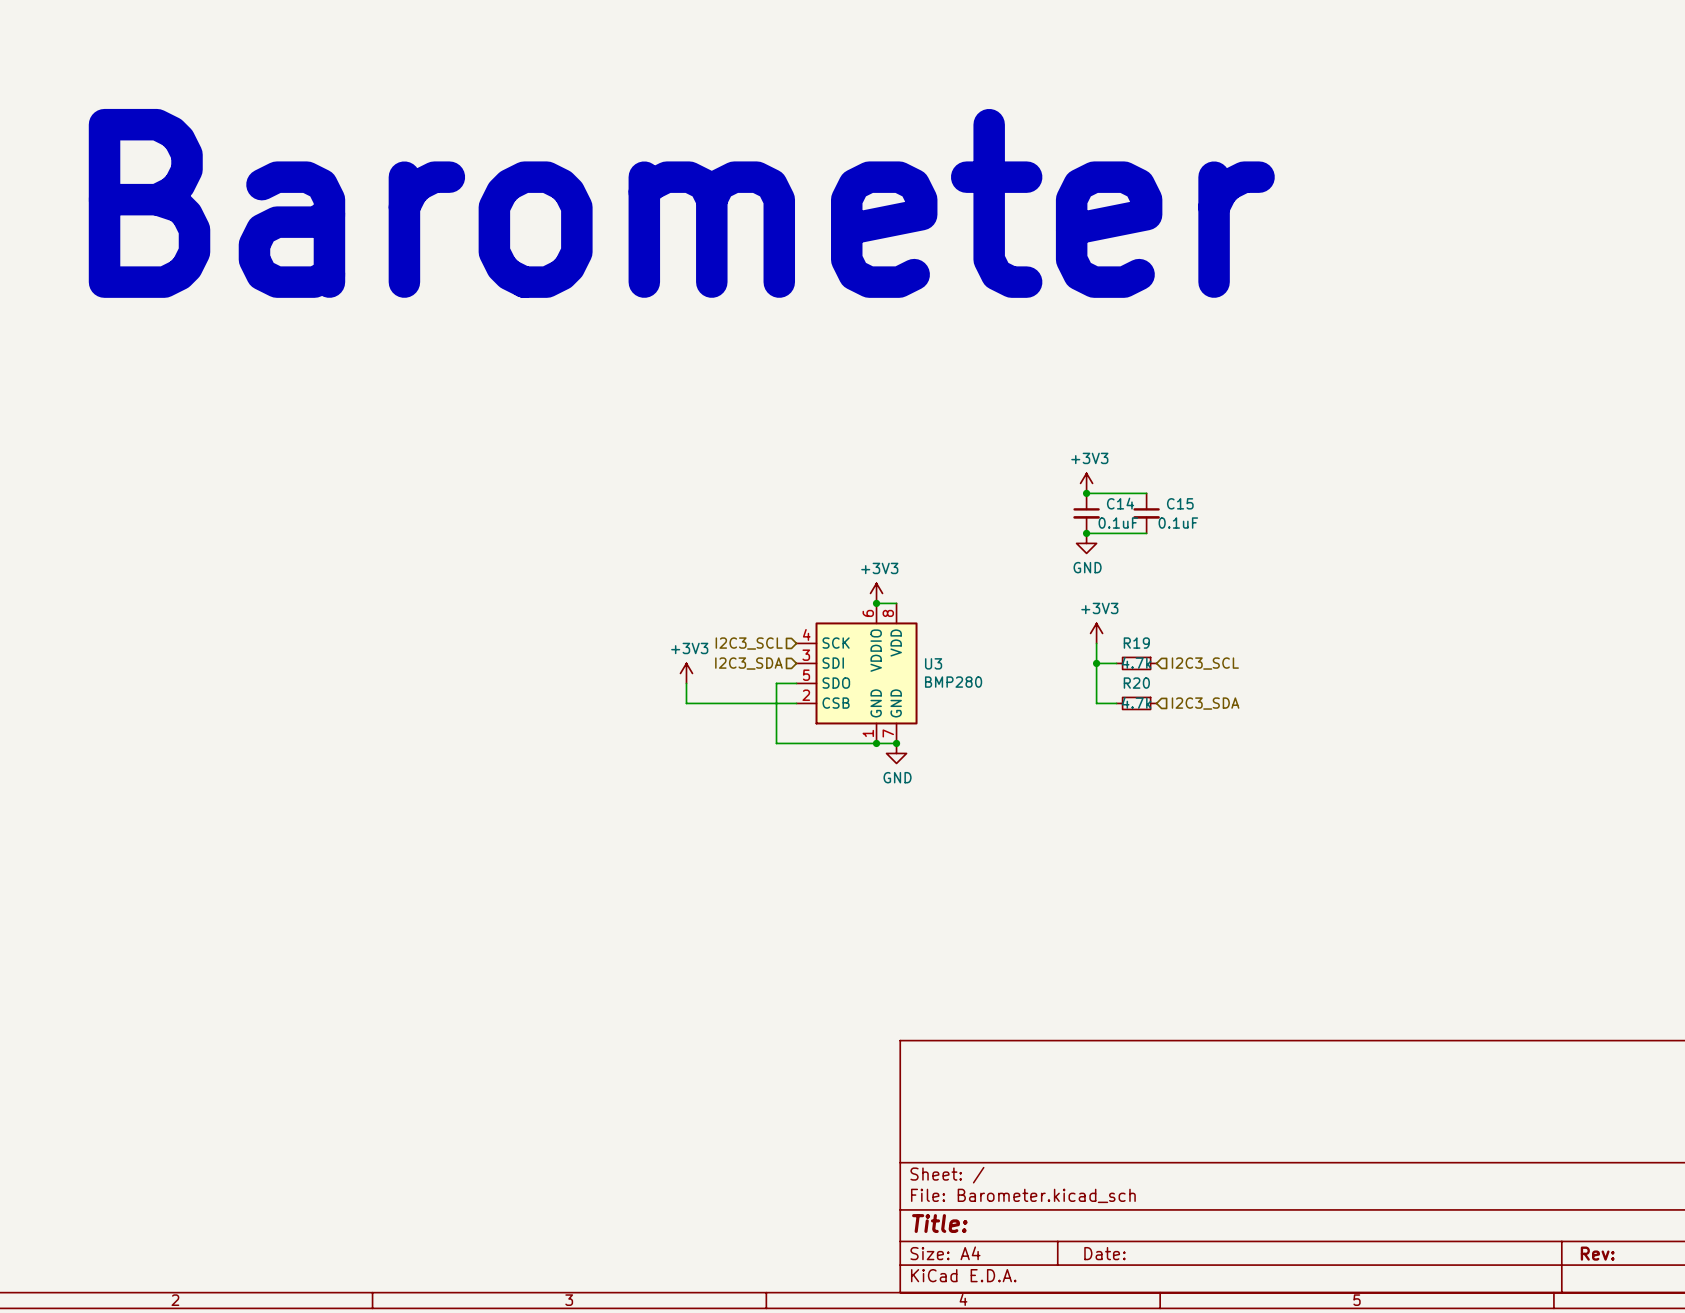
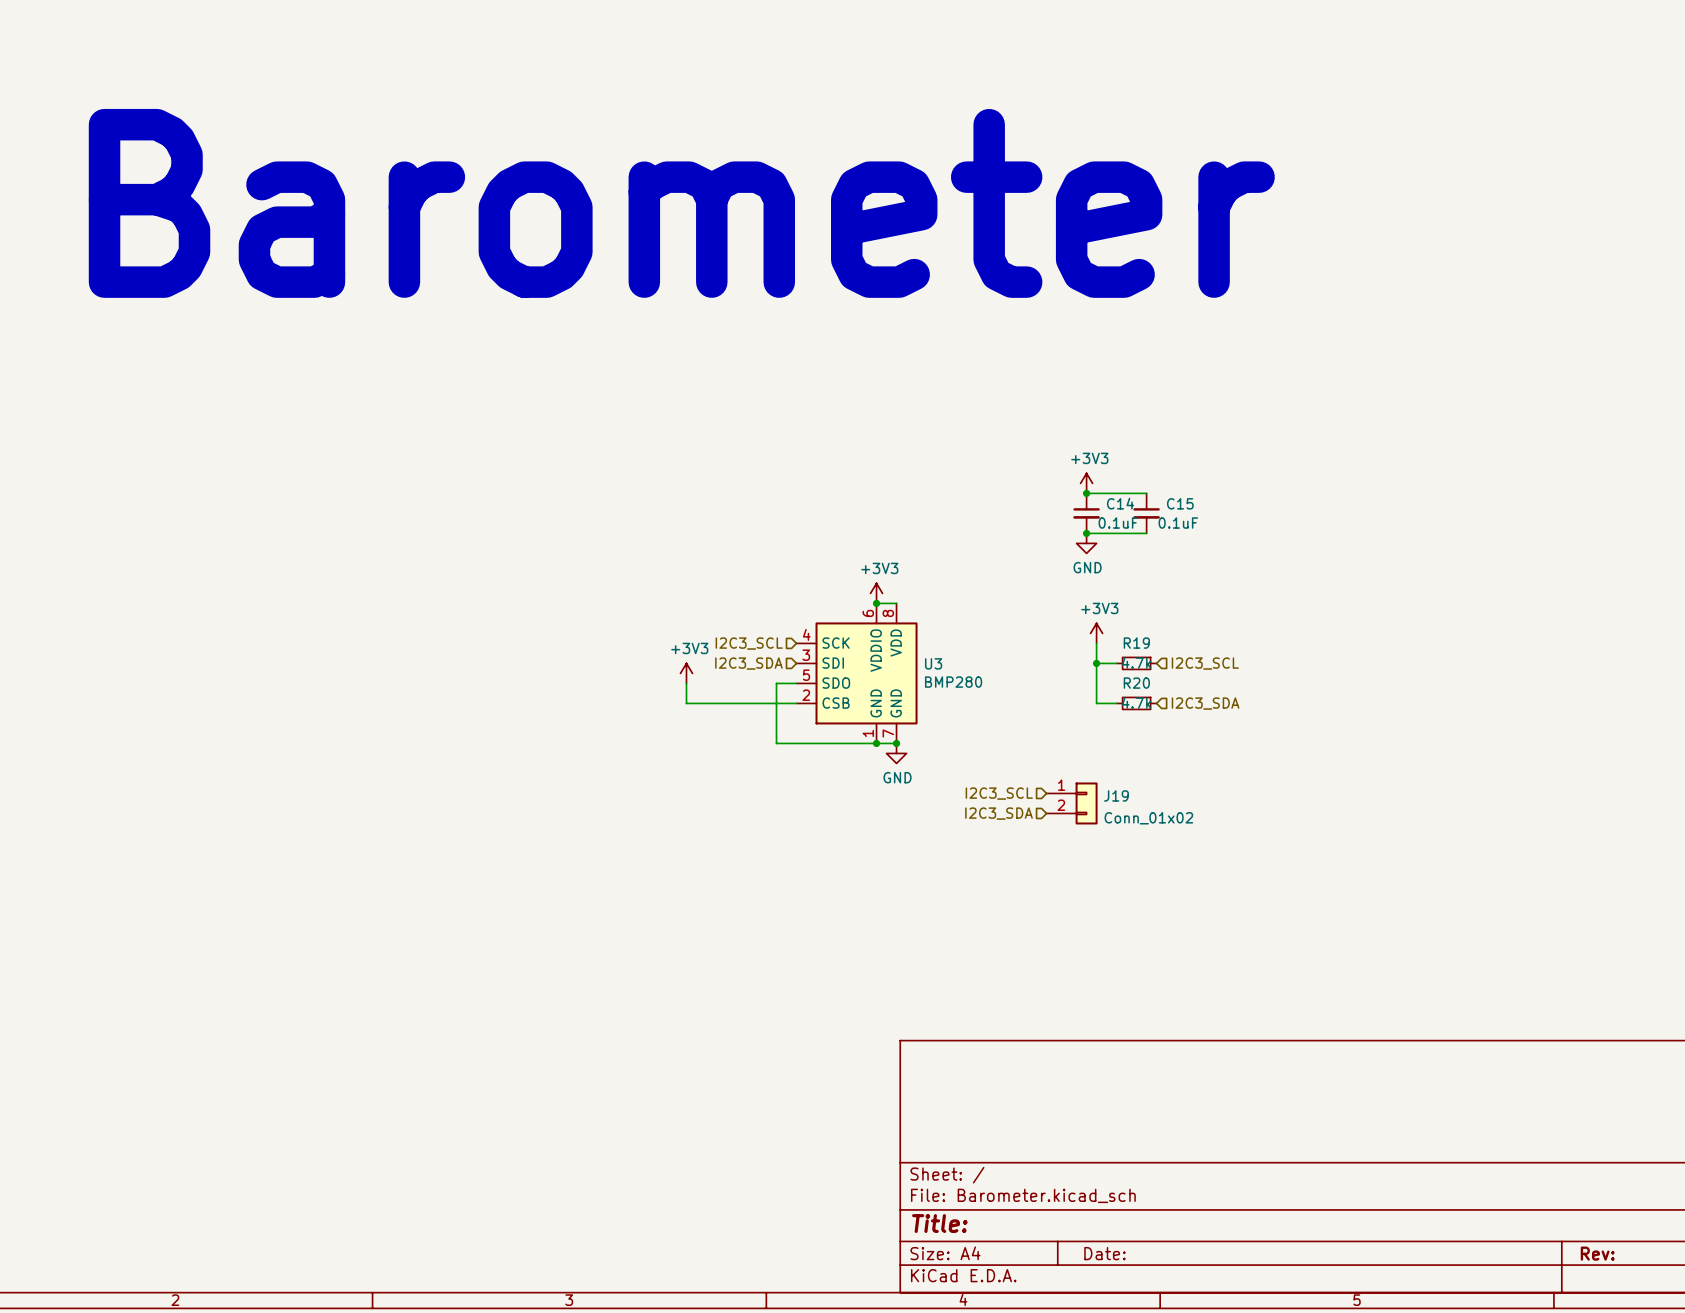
hierarchical label: none -> I2C3_SCL (999, 793)
J19: none -> Conn_01x02 (1072, 803)
hierarchical label: none -> I2C3_SDA (999, 813)

